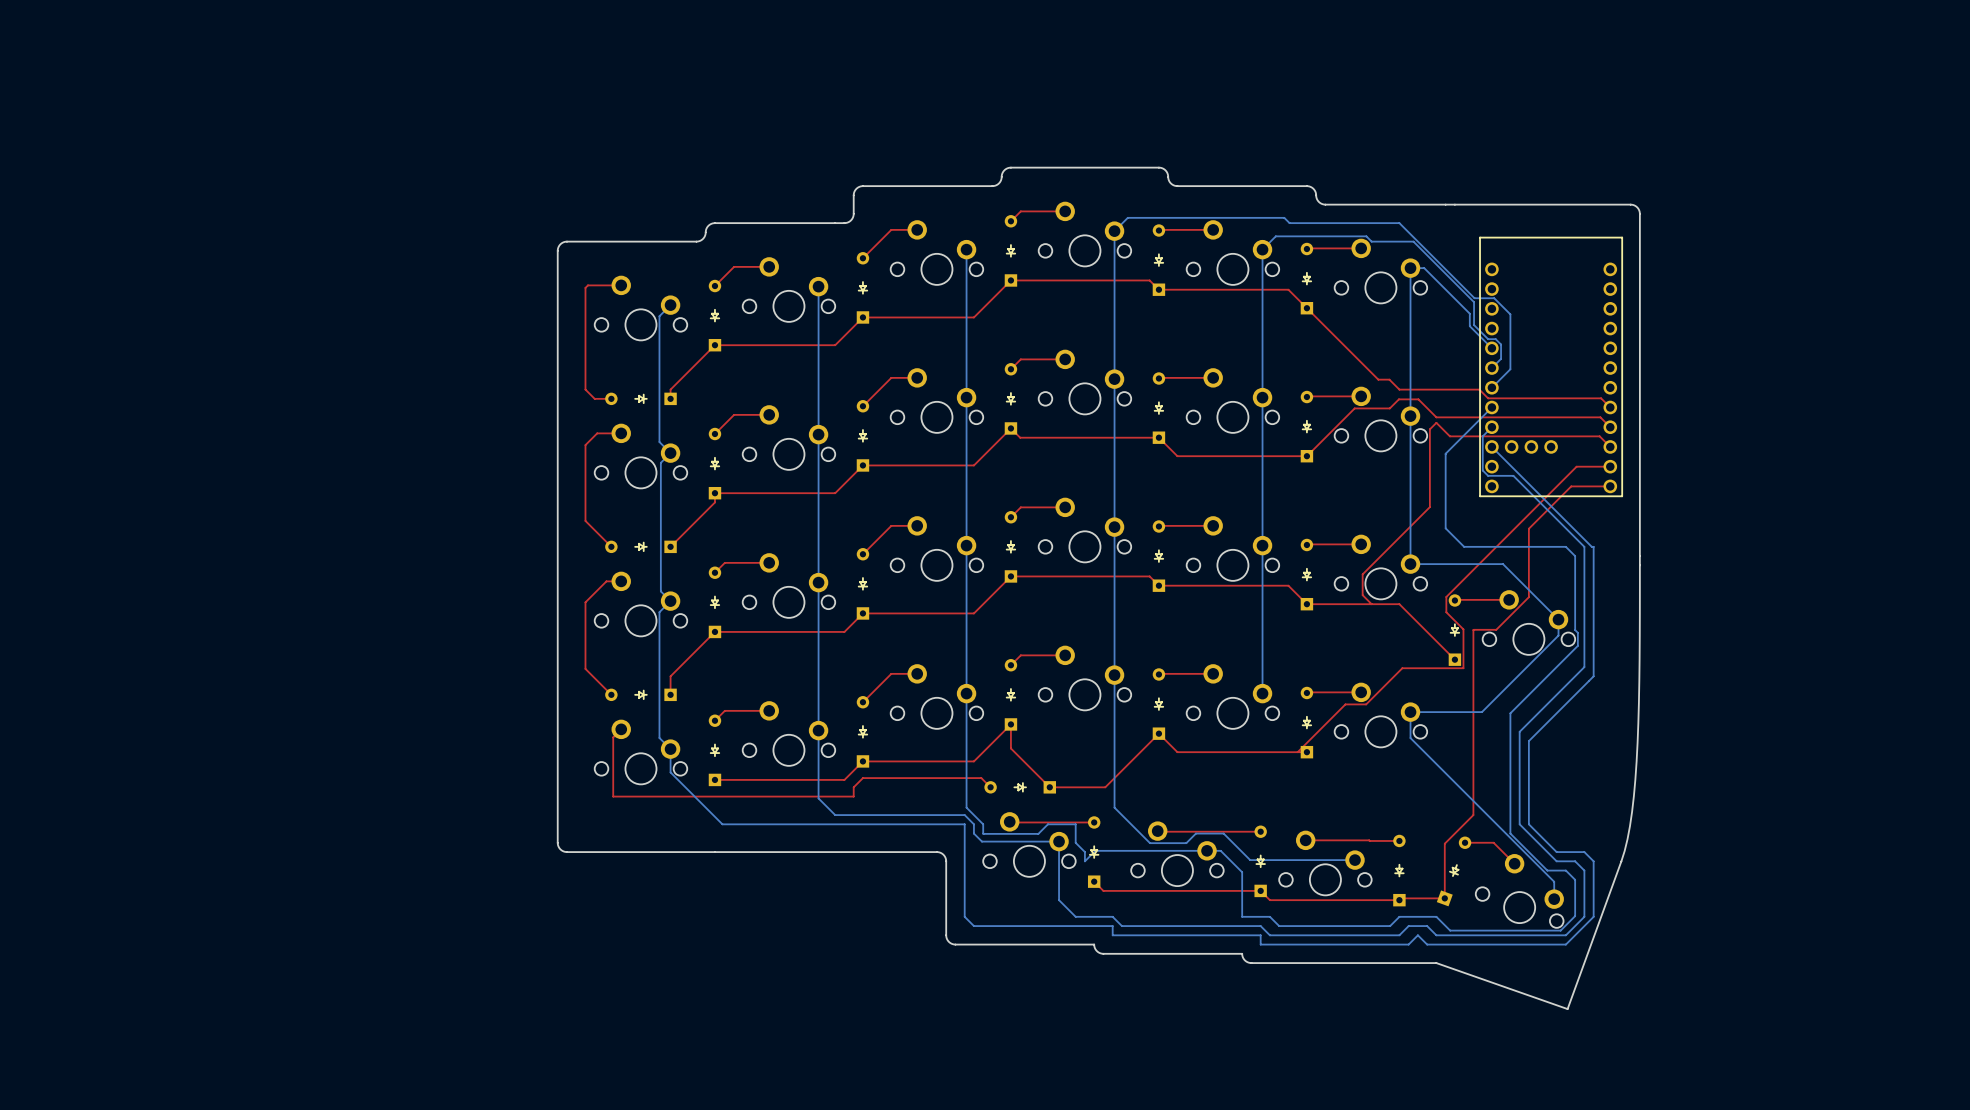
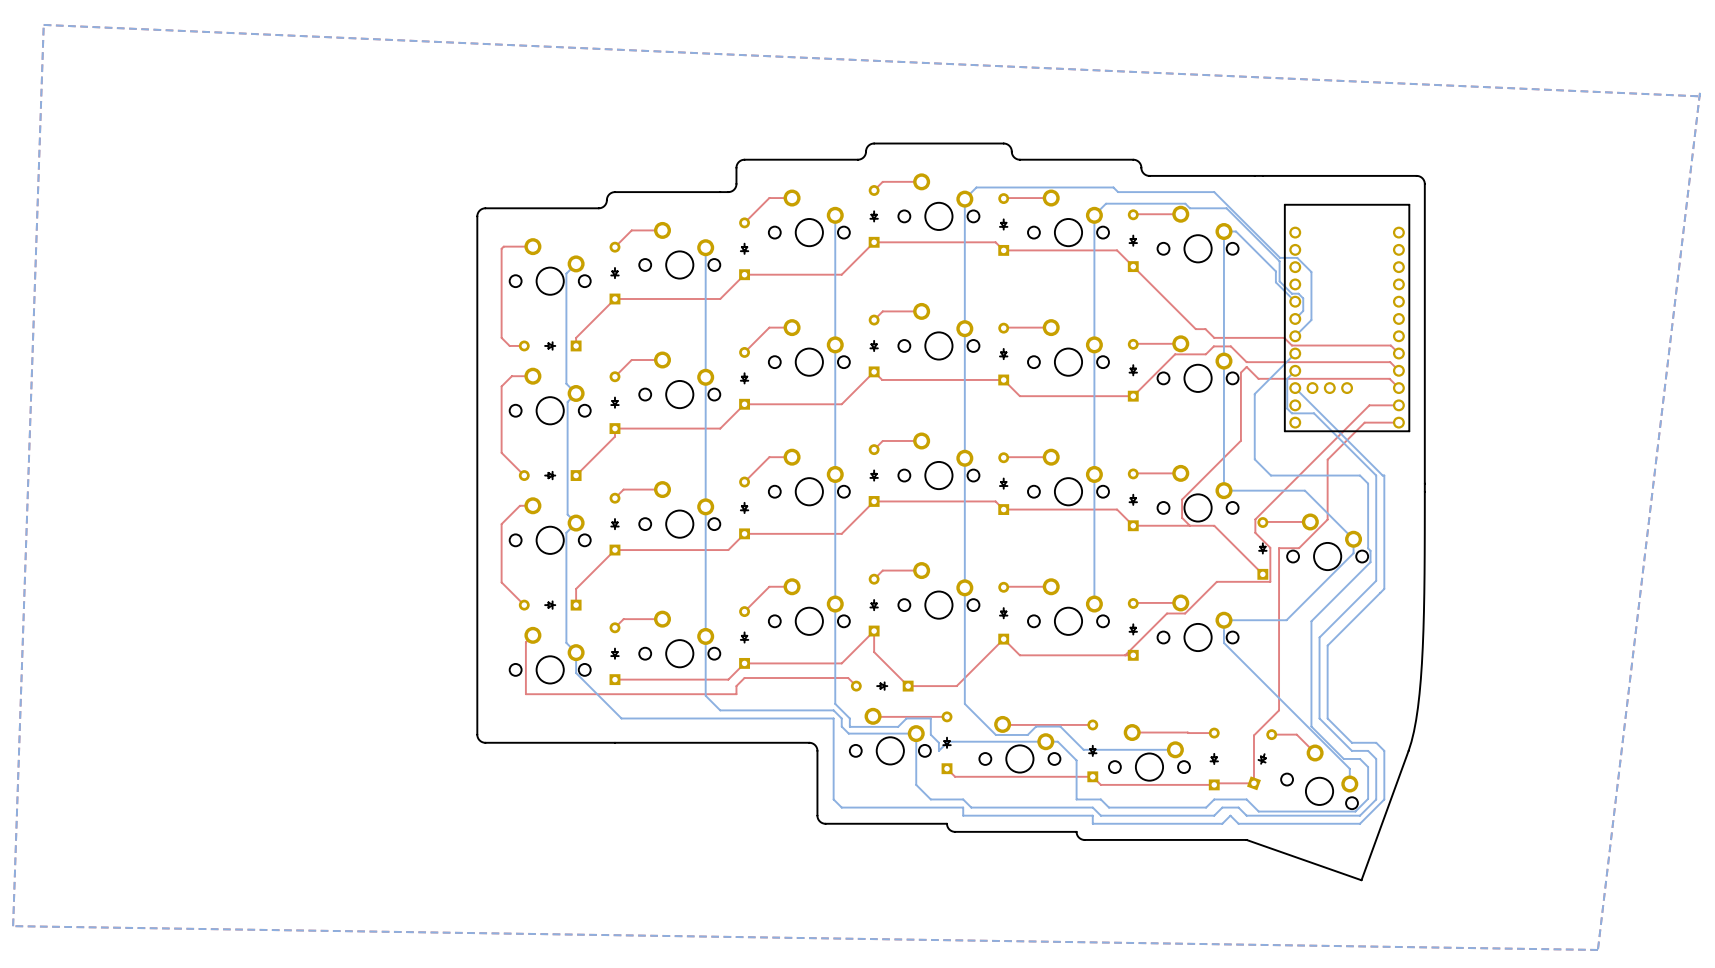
bottom zone outline: none -> (43, 24) (13, 926) (1597, 949) (1699, 92) (1699, 96) (43, 24)

